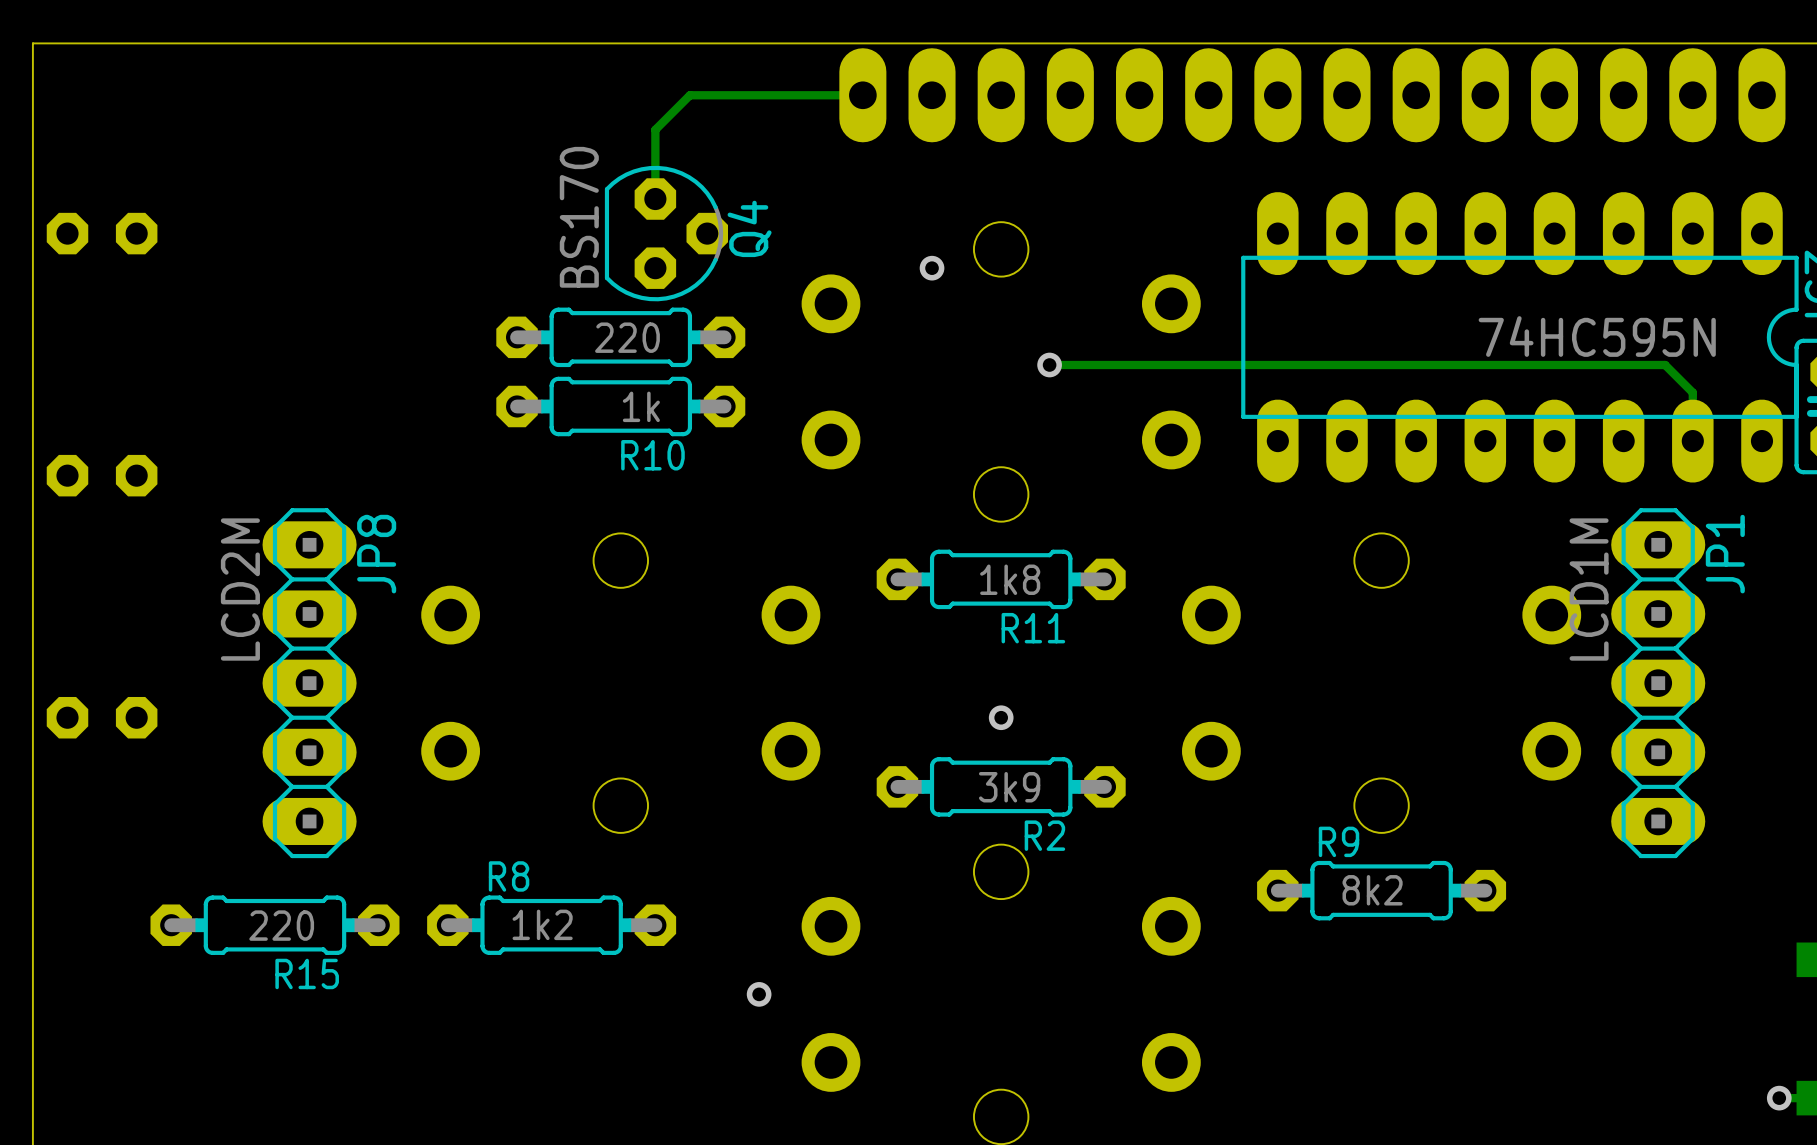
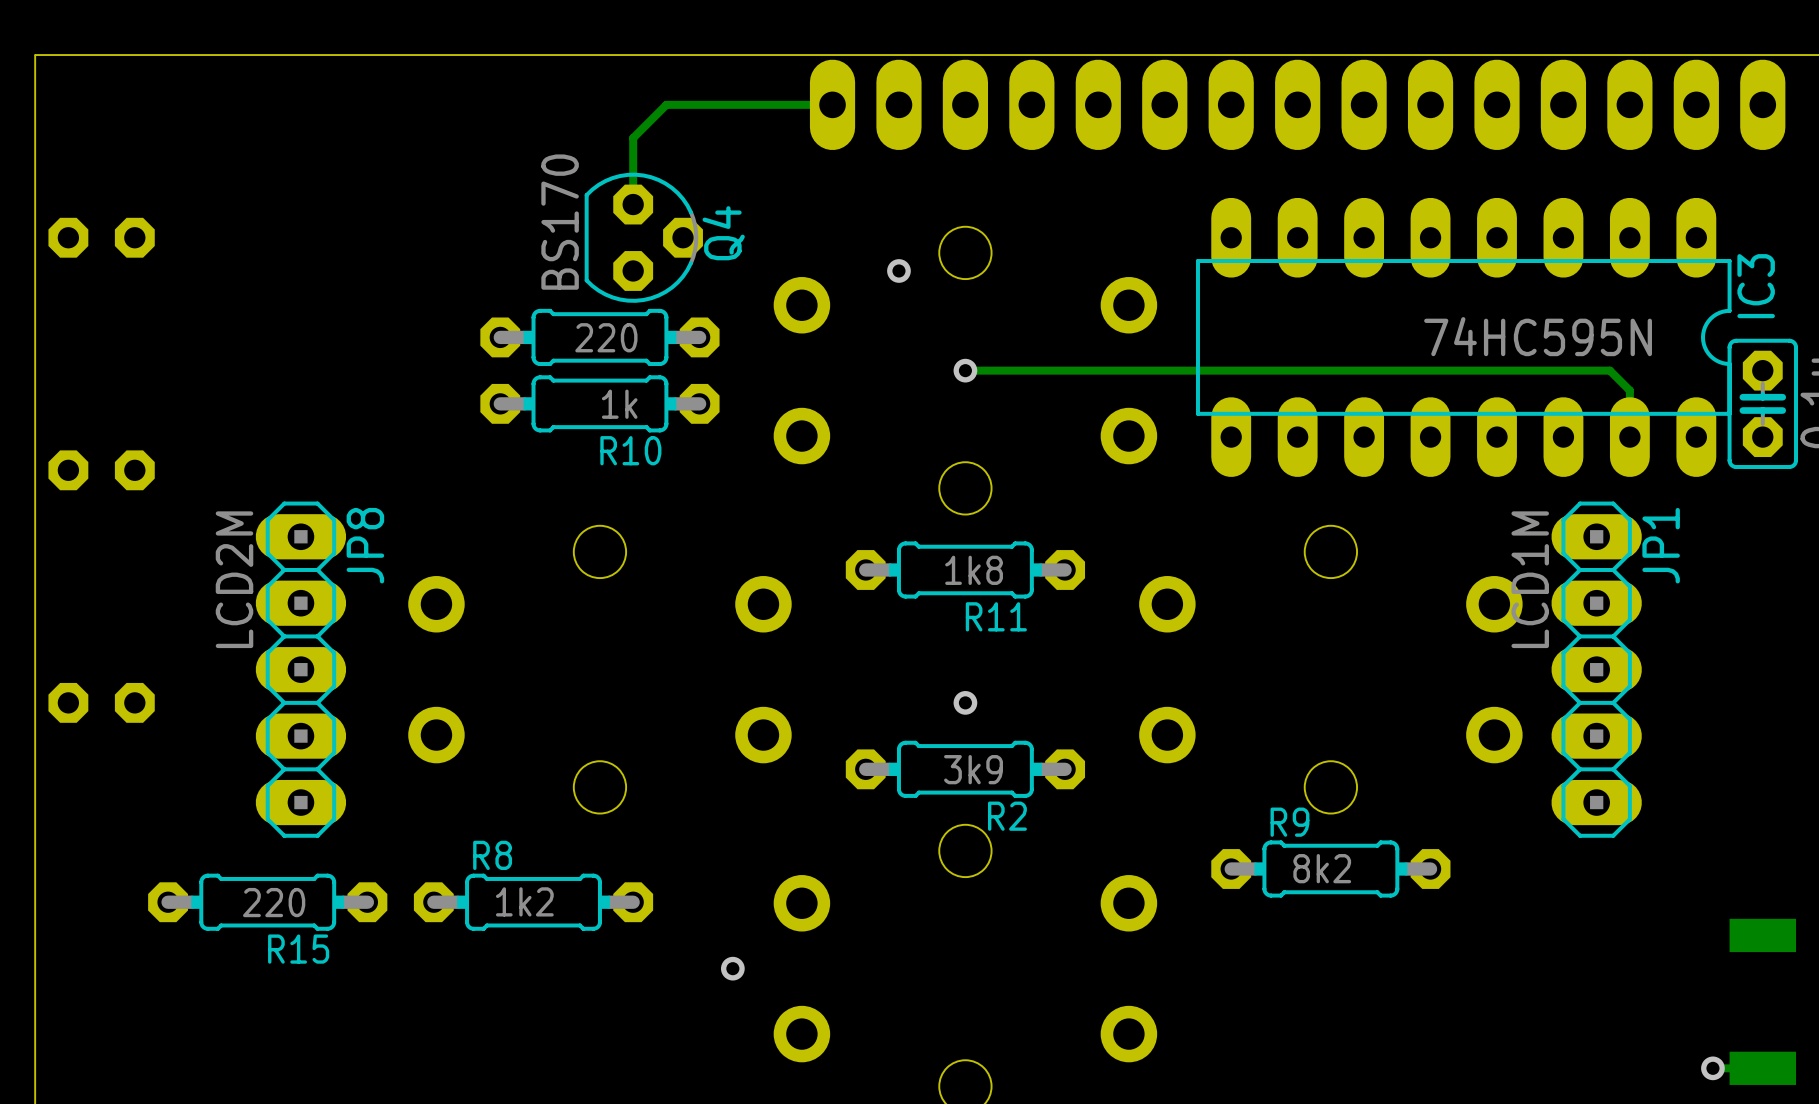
track: (1049, 365) (1665, 365) (1672, 371) -> (965, 370) (1609, 370)
via position: (1049, 365) -> (965, 370)

